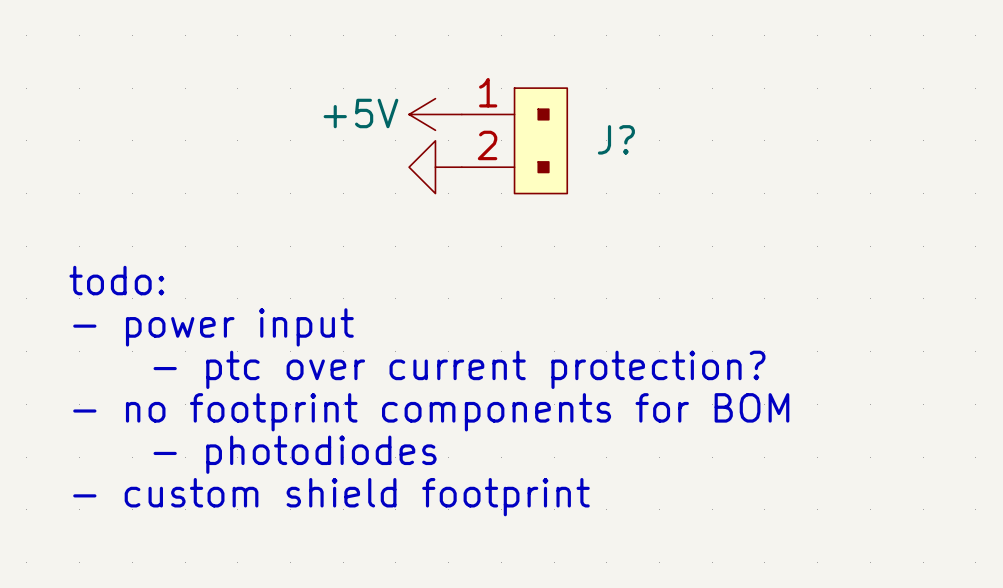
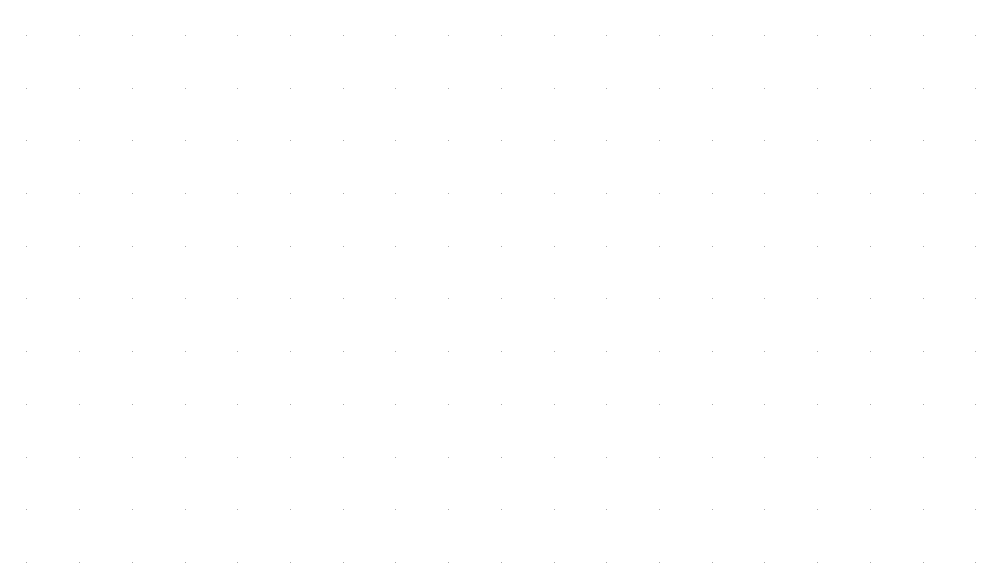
power symbol: +5V (435, 114) -> none
J?: (514, 140) -> none
power symbol: (435, 167) -> none
text: todo: (116, 280) -> none
text: - power input (213, 327) -> none
text: - ptc over current protection? (459, 369) -> none
text: - no footprint components for BOM (431, 412) -> none
text: - photodiodes (295, 454) -> none
text: - custom shield footprint (331, 497) -> none

